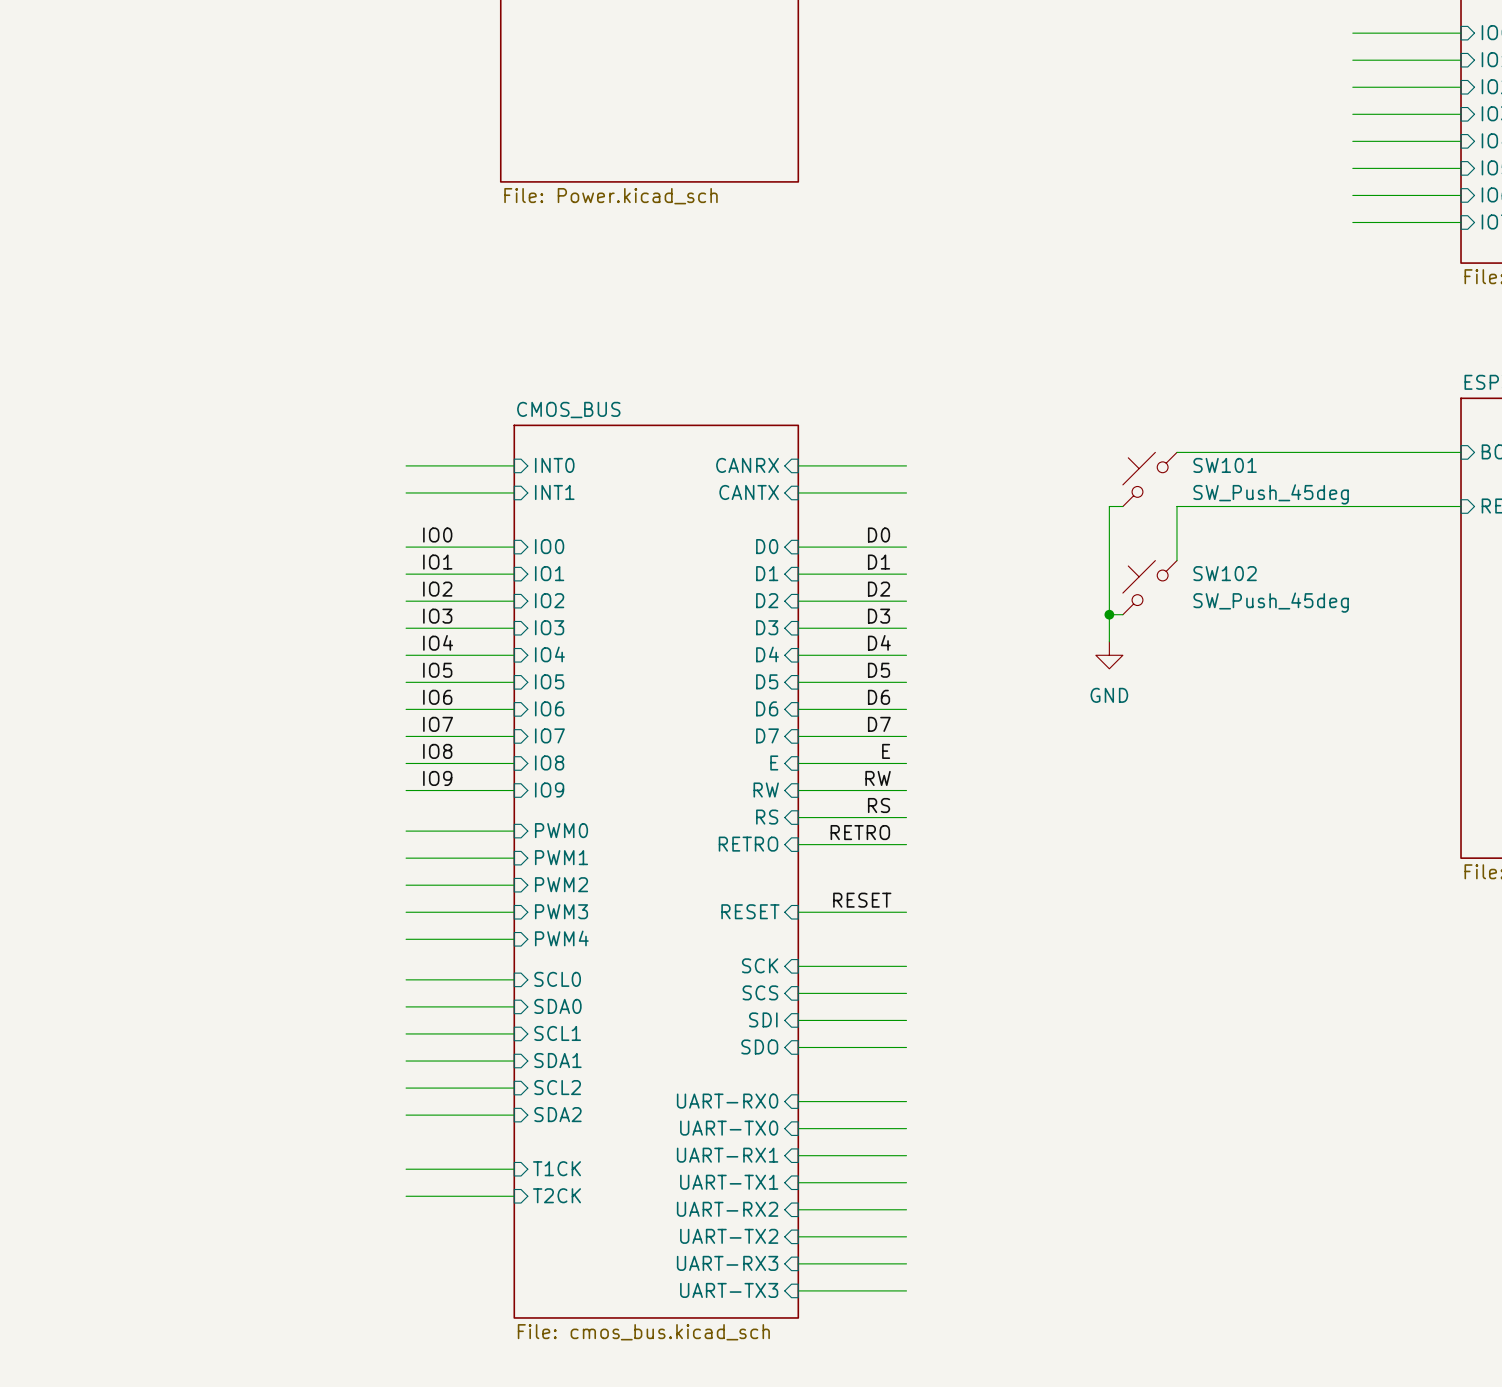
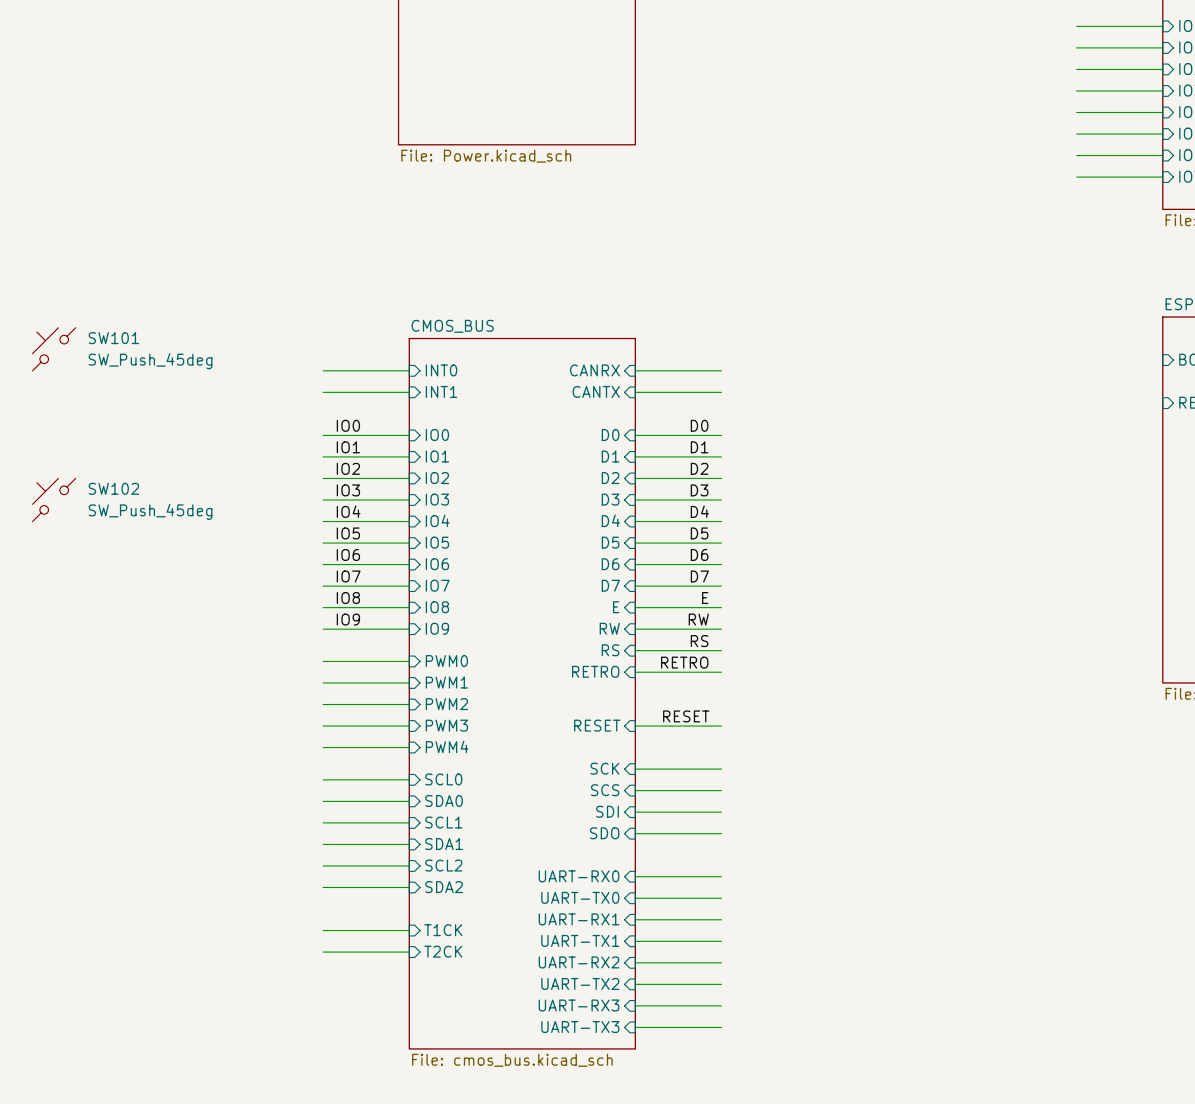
wire: (1176, 452) (1461, 452) -> none
SW101 position: (1149, 479) -> (54, 349)
wire: (1122, 506) (1109, 506) (1109, 641) -> none
wire: (1461, 506) (1176, 506) (1176, 560) -> none
SW102 position: (1149, 587) -> (54, 499)
wire: (1109, 614) (1122, 614) -> none
junction: (1109, 614) -> none
power symbol: GND (1109, 655) -> none

